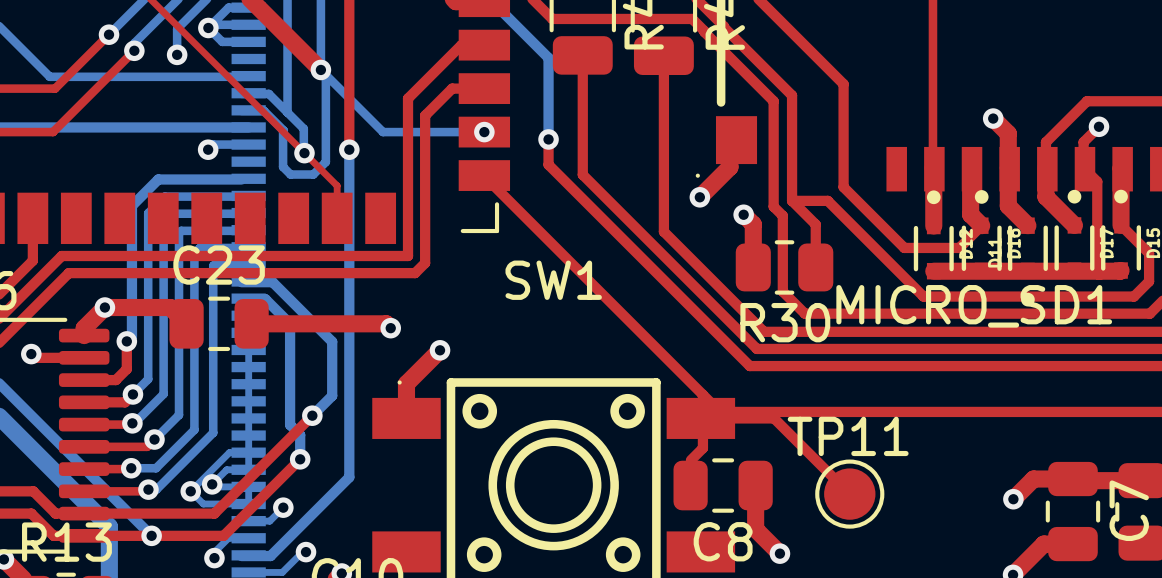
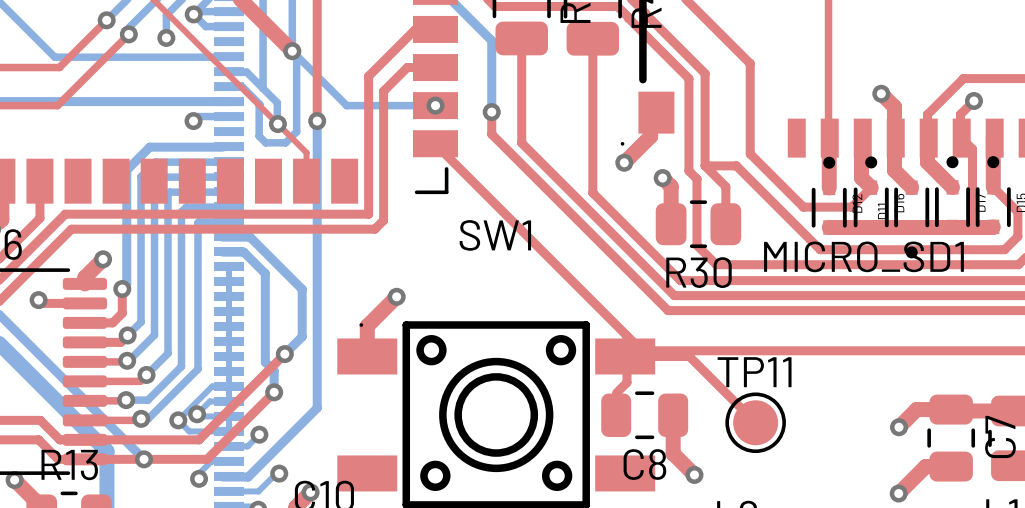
top track: (104, 307) (170, 307) (186, 323) -> none
C23: (219, 323) -> none
top track: (251, 323) (386, 323) (390, 328) -> none
via: (390, 328) -> none

